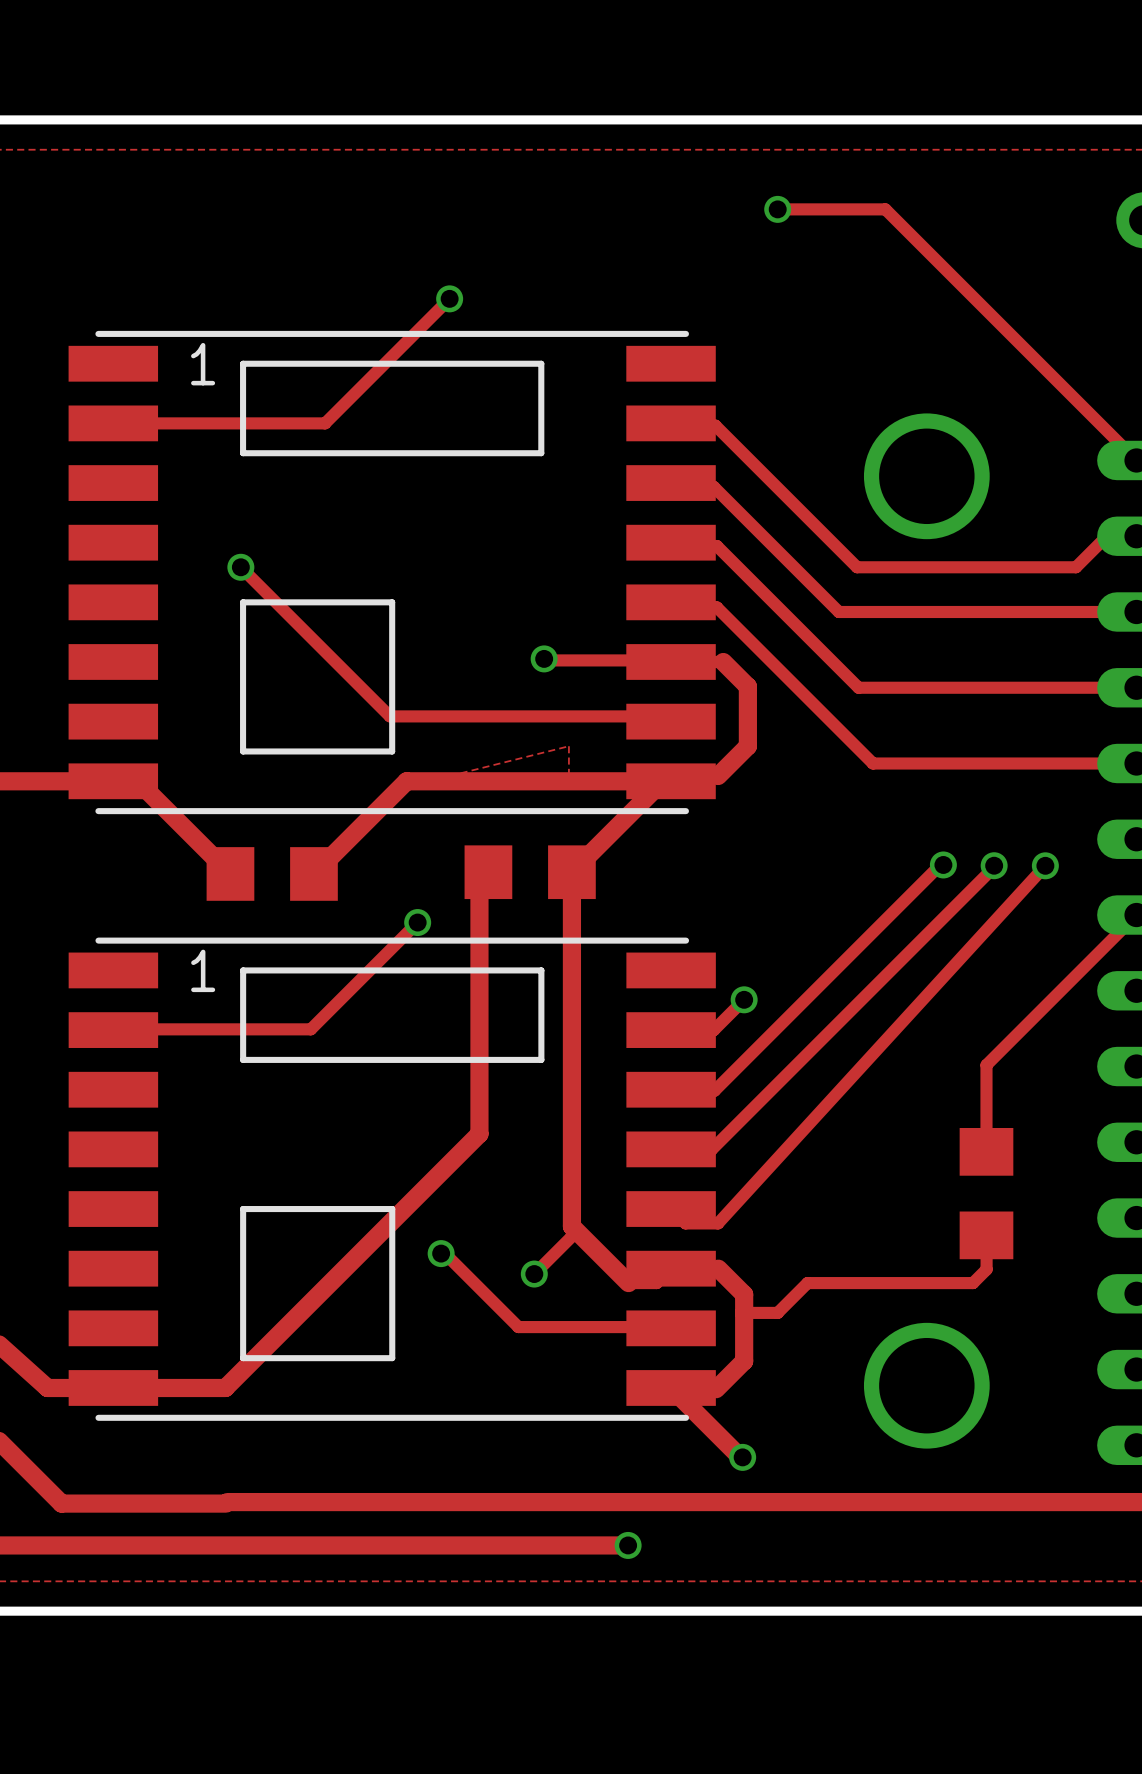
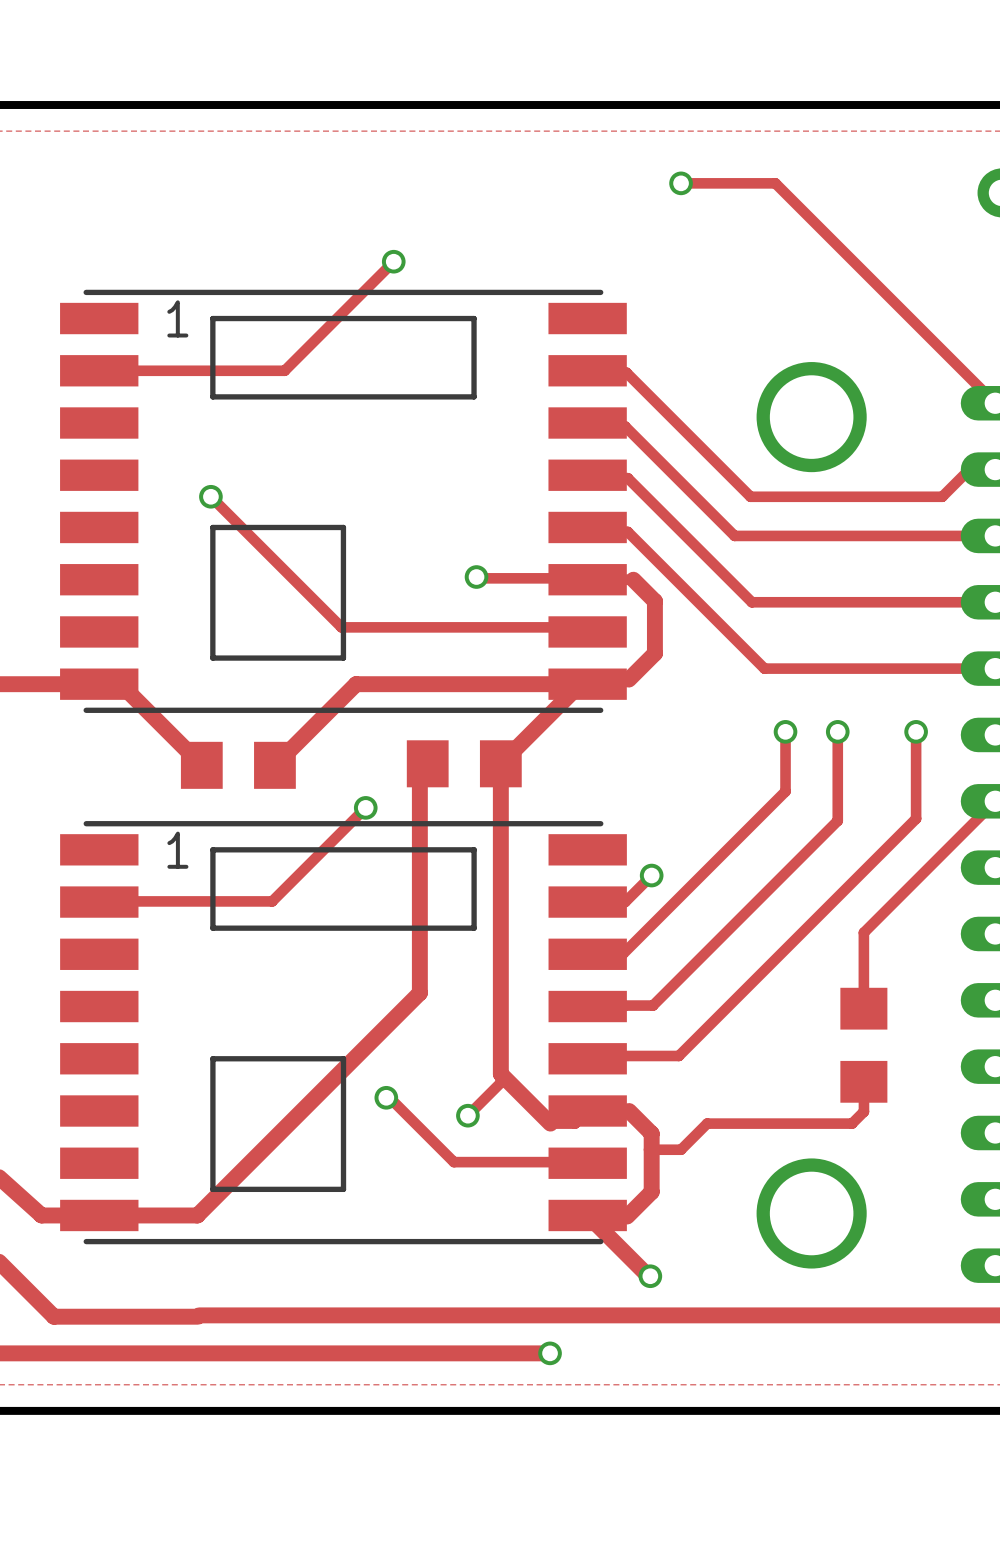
zone outline: (568, 746) (449, 776) (568, 776) (568, 746) -> none
via: none -> (785, 731)
via: none -> (837, 731)
via: none -> (916, 731)
track: (943, 864) (942, 862) (714, 1090) (671, 1089) -> (785, 731) (785, 791) (622, 954) (587, 954)
via: (943, 864) -> none
track: (994, 865) (713, 1148) -> (837, 731) (837, 820) (653, 1005) (624, 1005)
via: (994, 865) -> none
track: (1045, 865) (718, 1223) (685, 1223) (671, 1209) -> (916, 731) (916, 818) (678, 1055) (590, 1055) (587, 1058)
via: (1045, 865) -> none

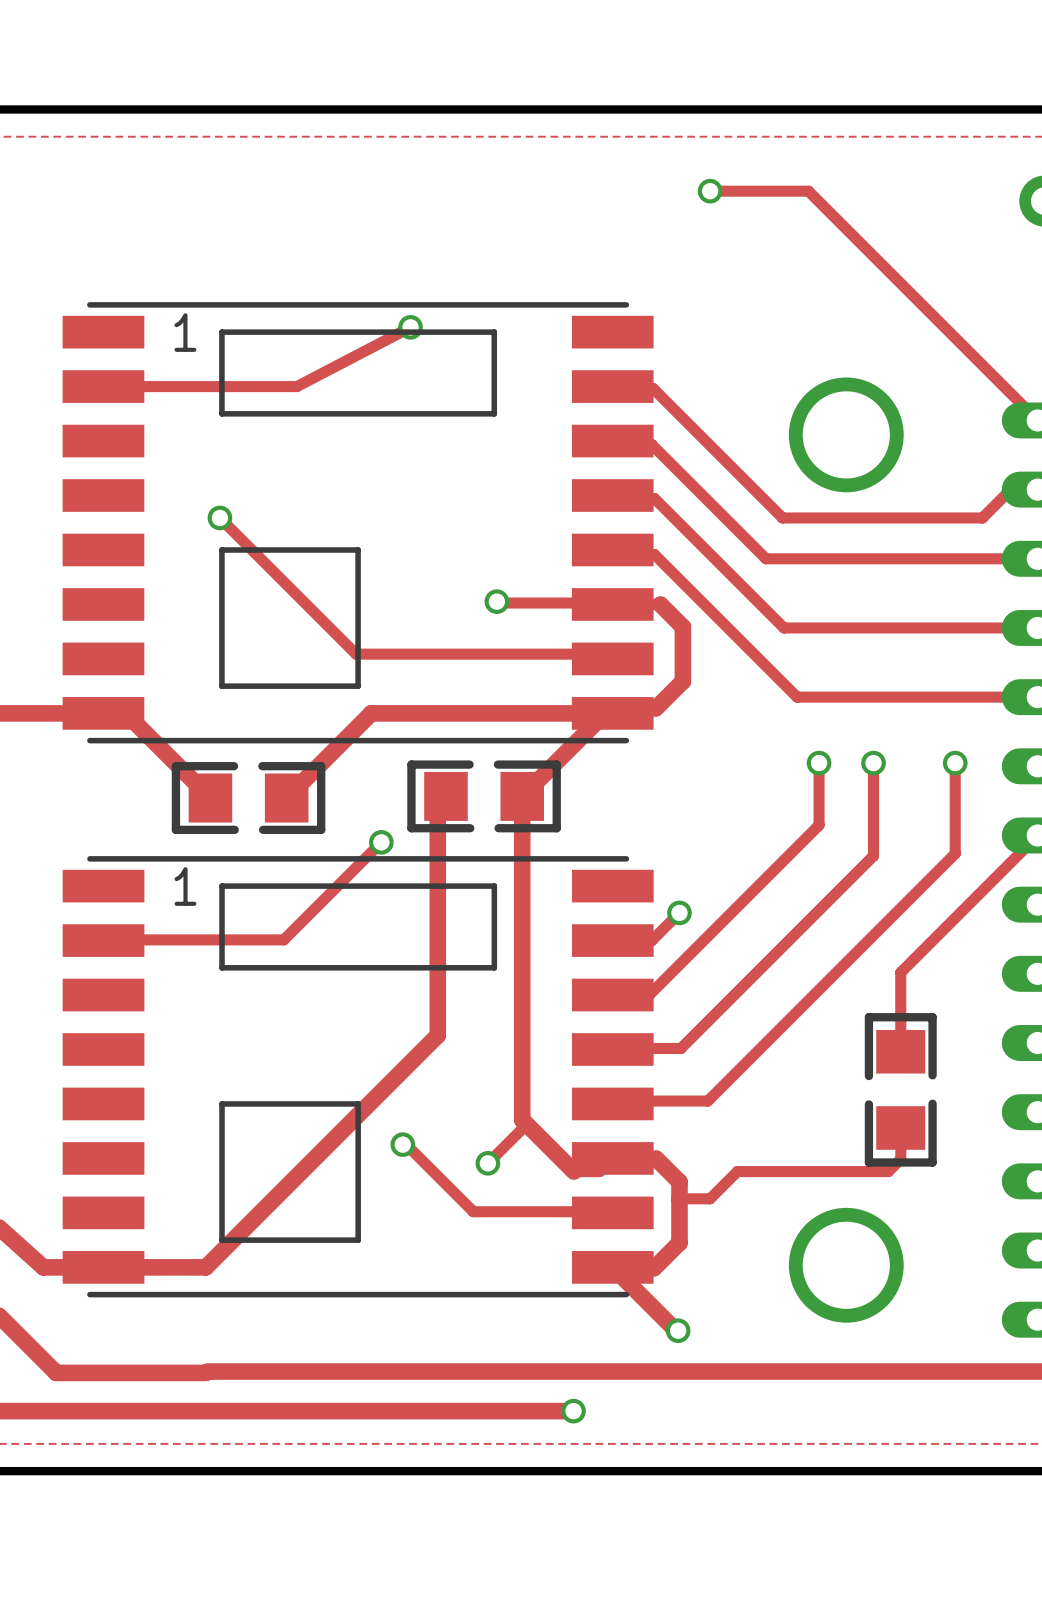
track: (393, 261) (284, 370) -> (410, 327) (296, 386)
via position: (393, 261) -> (410, 327)
part footprint: [406, 740, 522, 788] -> [407, 760, 561, 833]
part footprint: [180, 741, 296, 789] -> [171, 762, 326, 834]
part footprint: [840, 987, 888, 1103] -> [864, 1013, 937, 1167]

